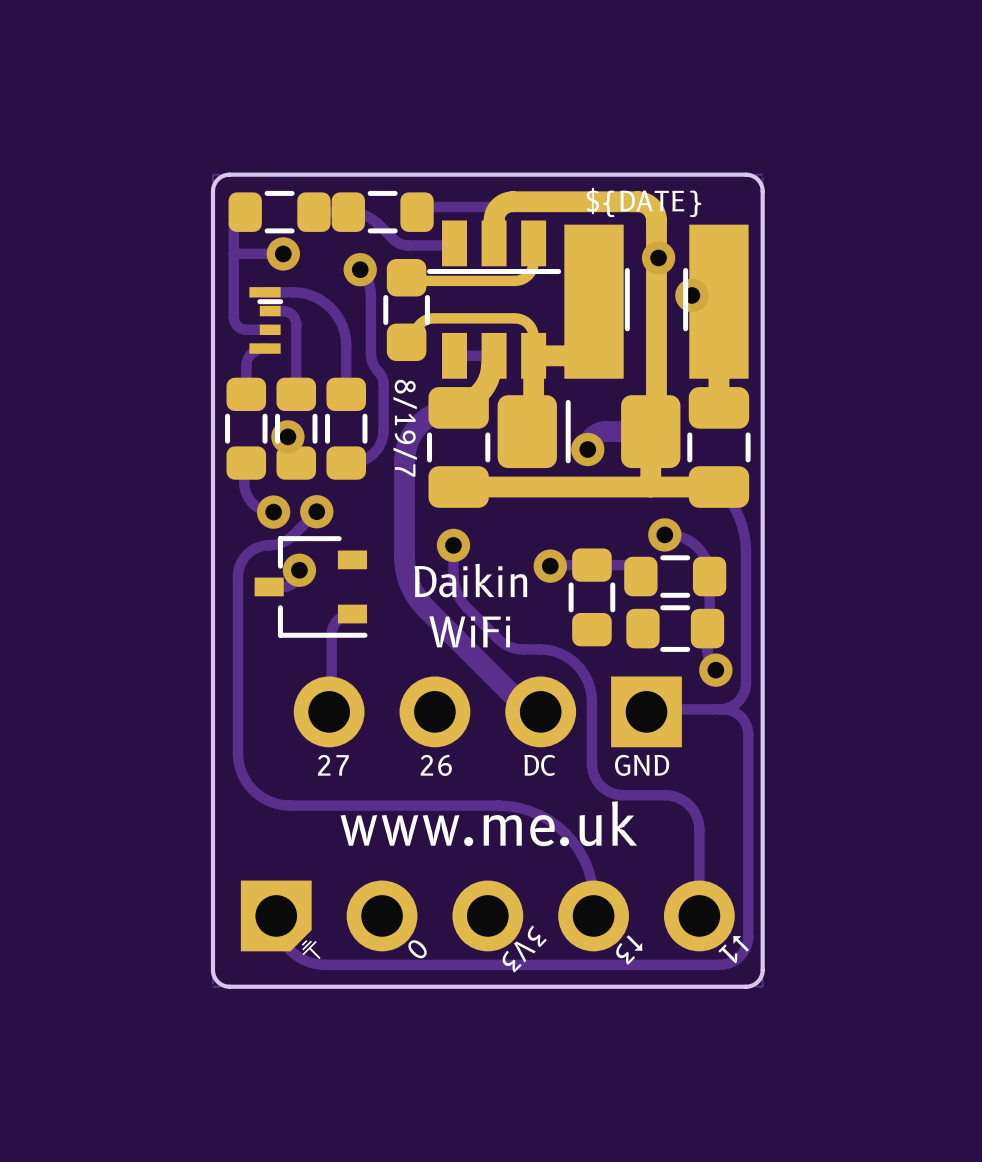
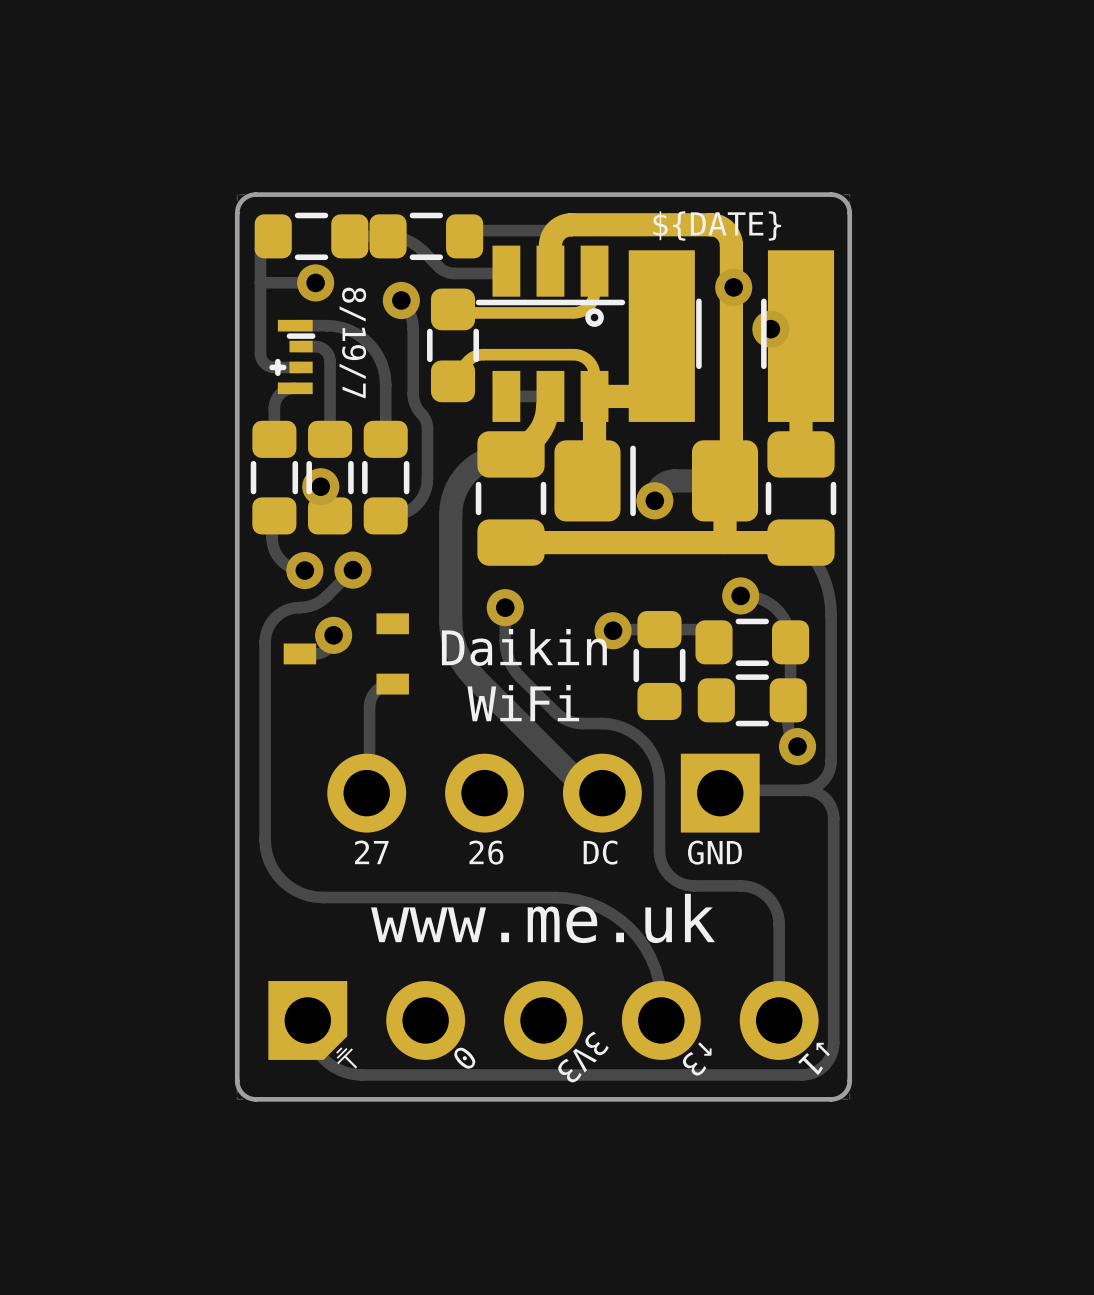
part footprint: [386, 191, 750, 508] -> [430, 213, 835, 566]
part footprint: [249, 287, 284, 354] -> [269, 319, 316, 395]
text position: 8/19/7 (405, 428) -> 8/19/7 (352, 342)
part footprint: [254, 536, 368, 638] -> [283, 613, 409, 695]

